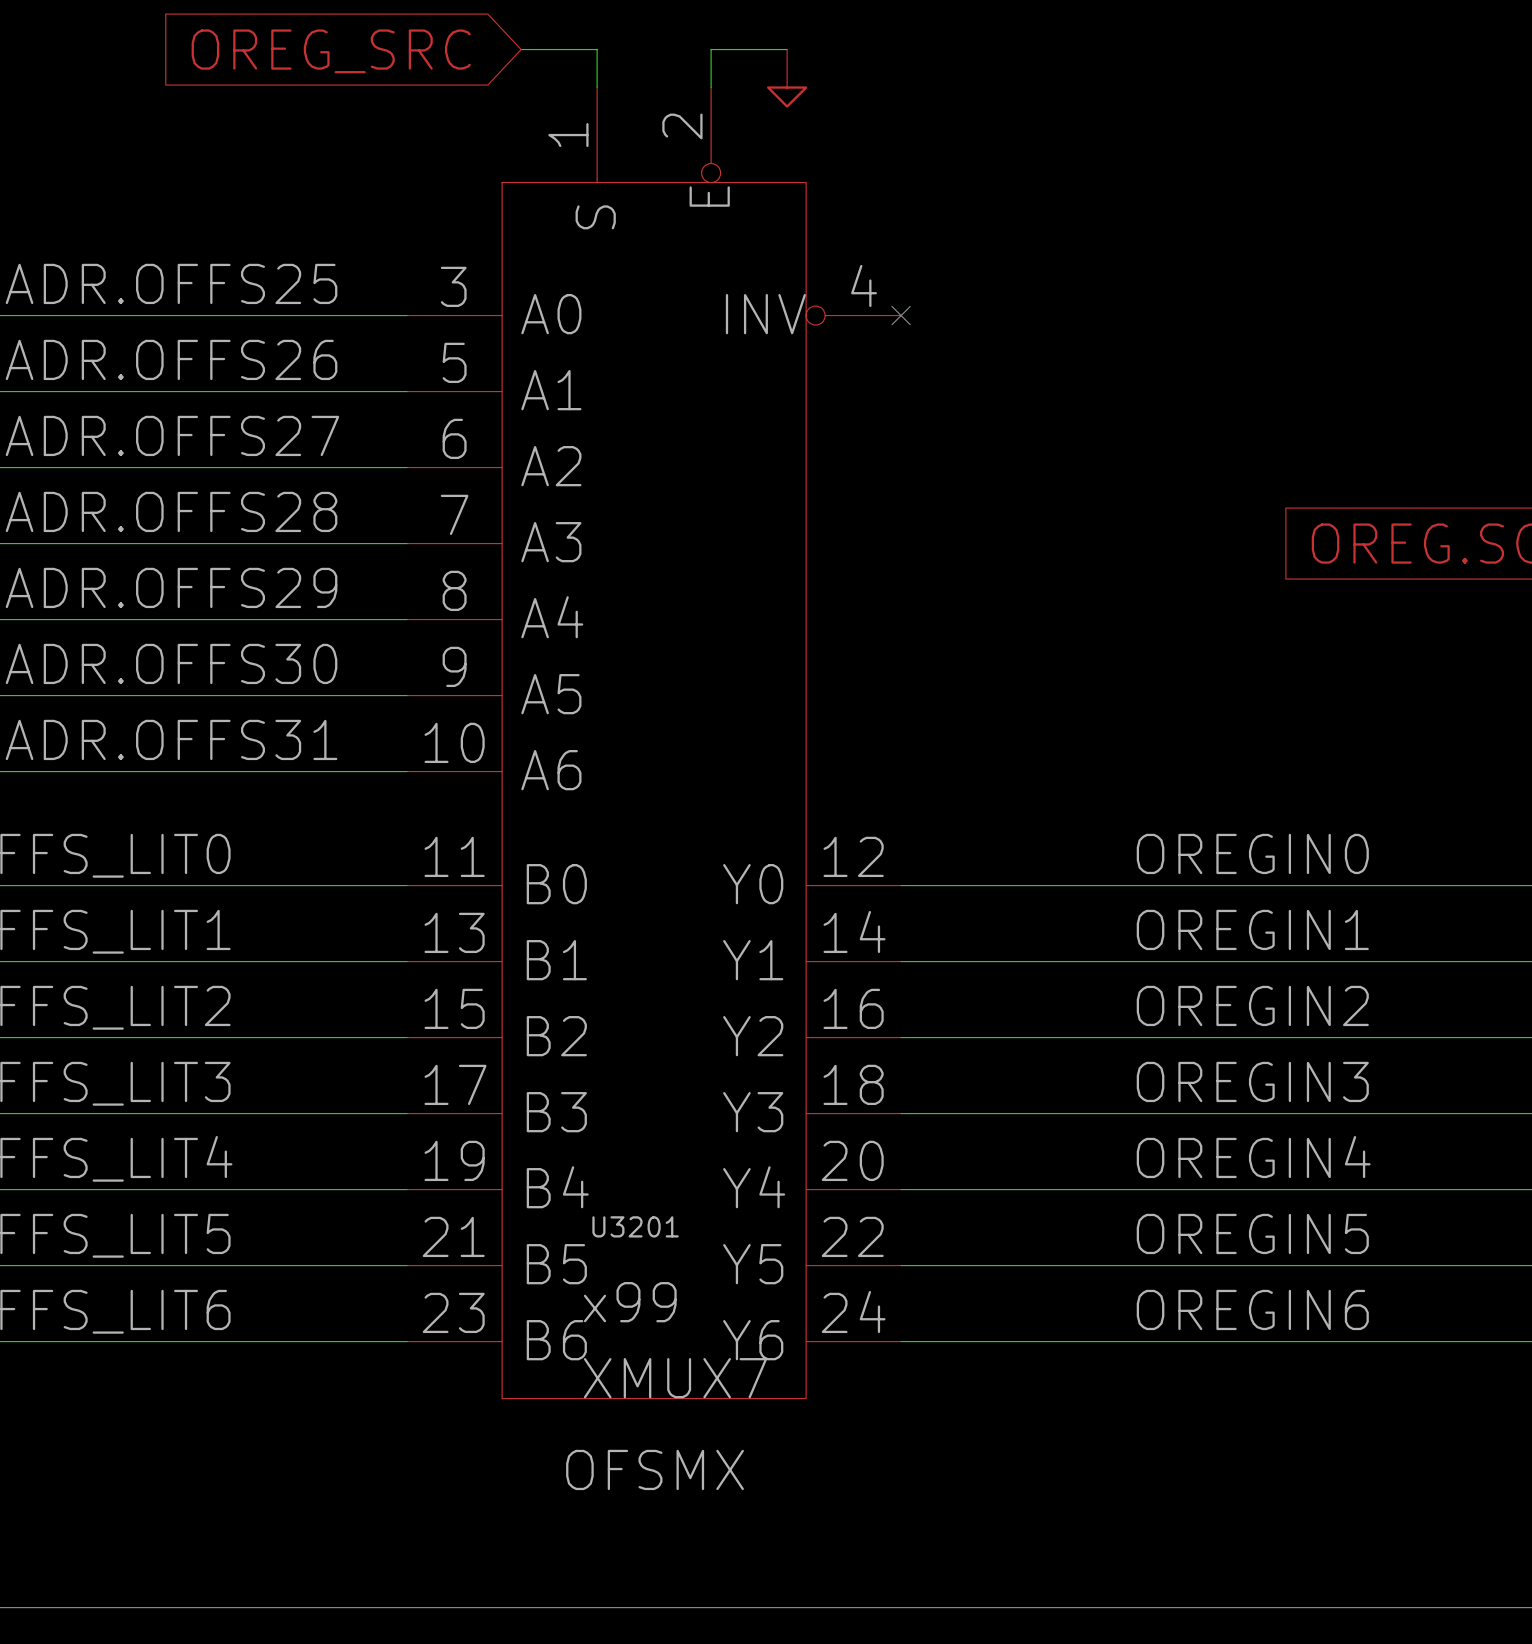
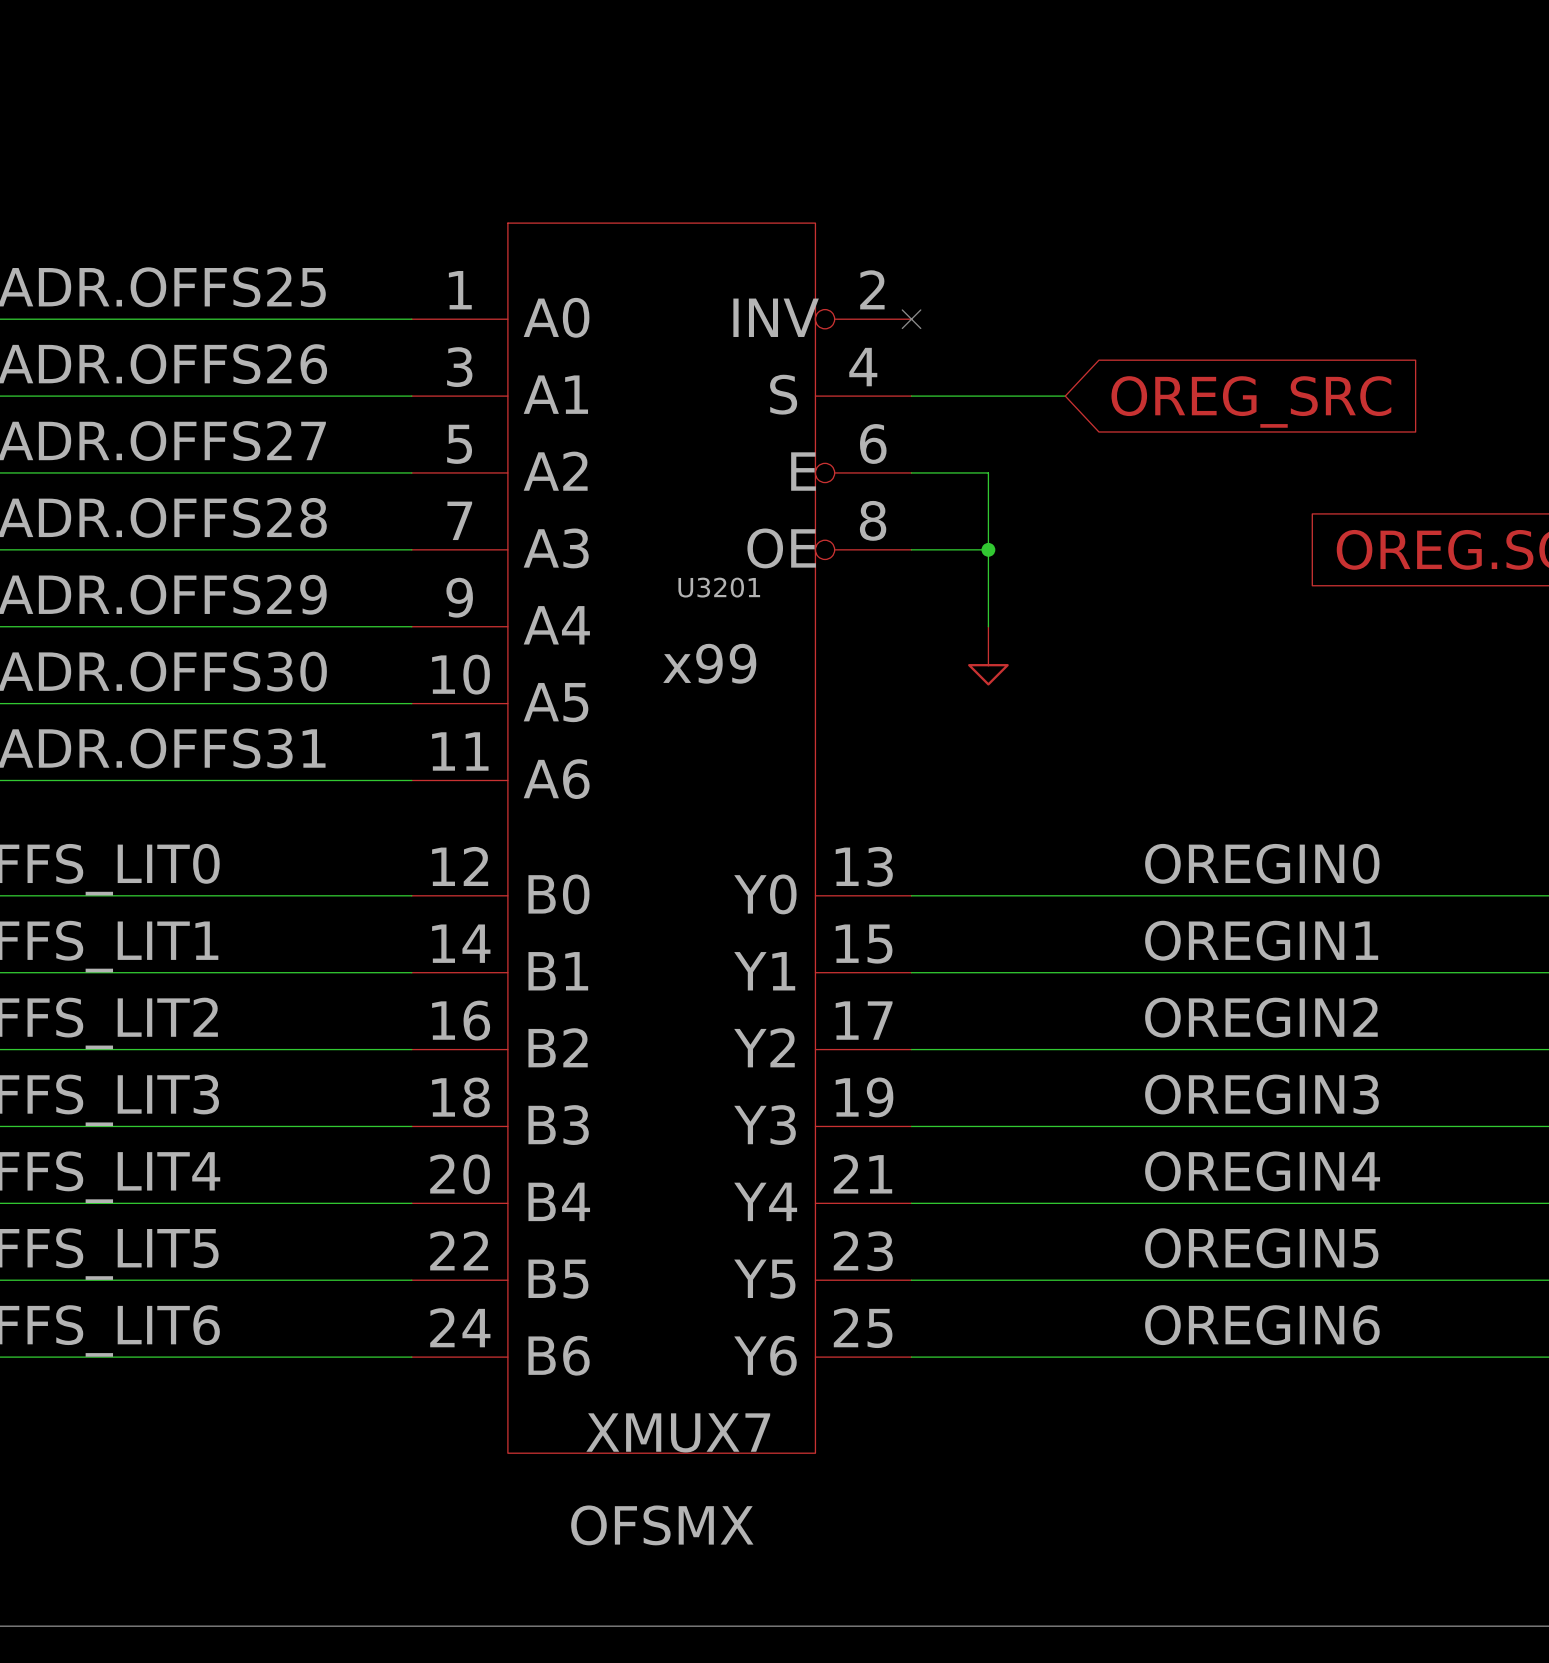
wire: (521, 49) (597, 49) (597, 87) -> none
wire: (787, 49) (711, 49) (711, 87) -> none
global label: OREG_SRC (331, 51) -> none
power symbol: (787, 78) -> none
U3201 symbol: [407, 87, 902, 1399] -> [411, 223, 912, 1454]
wire: none -> (911, 396) (1065, 396)
global label: none -> OREG_SRC (1251, 401)
wire: none -> (911, 472) (988, 472) (988, 626)
wire: none -> (911, 549) (988, 549)
junction: none -> (988, 549)
power symbol: none -> (988, 656)
U3201 name position: U3201 (635, 1226) -> U3201 (719, 587)
U3201 text position: x99 (630, 1302) -> x99 (709, 663)
U3201 value position: XMUX7 (675, 1378) -> XMUX7 (678, 1432)
U3201 text position: OFSMX (655, 1469) -> OFSMX (662, 1525)

